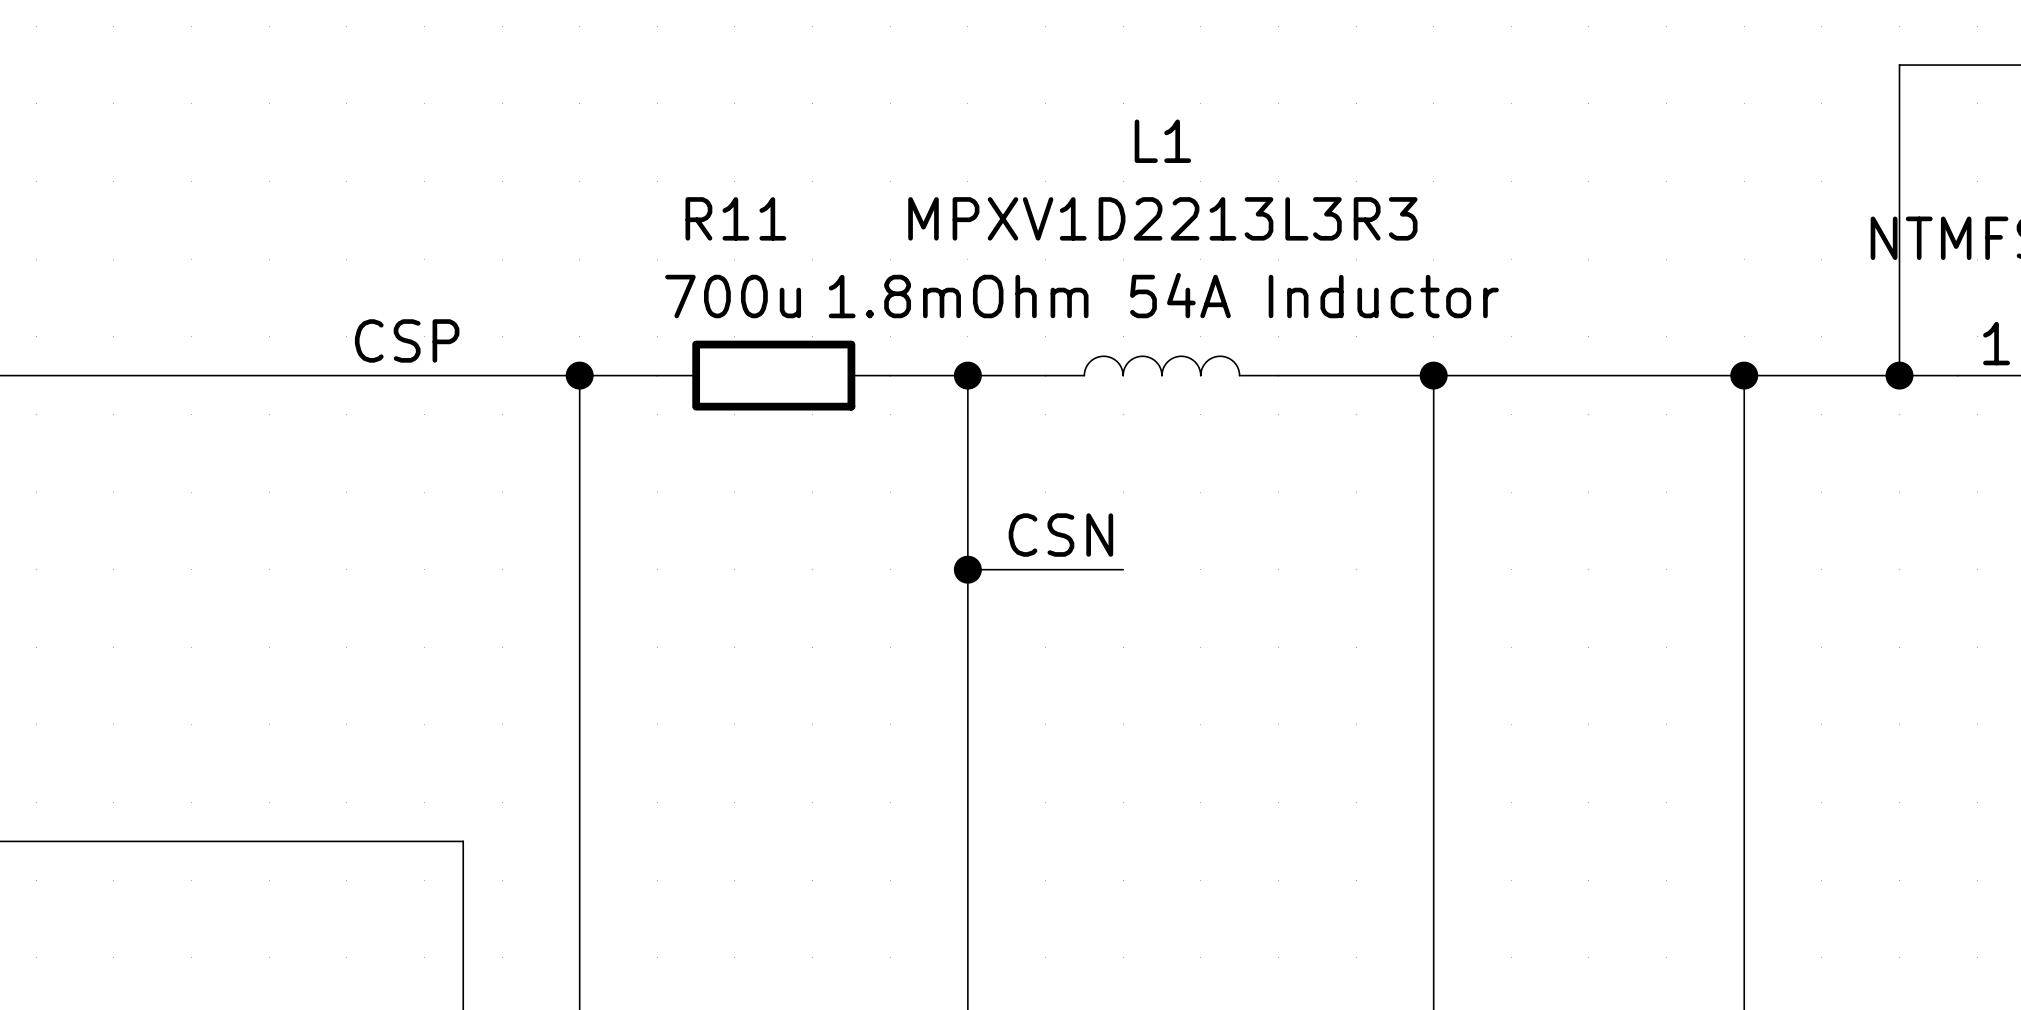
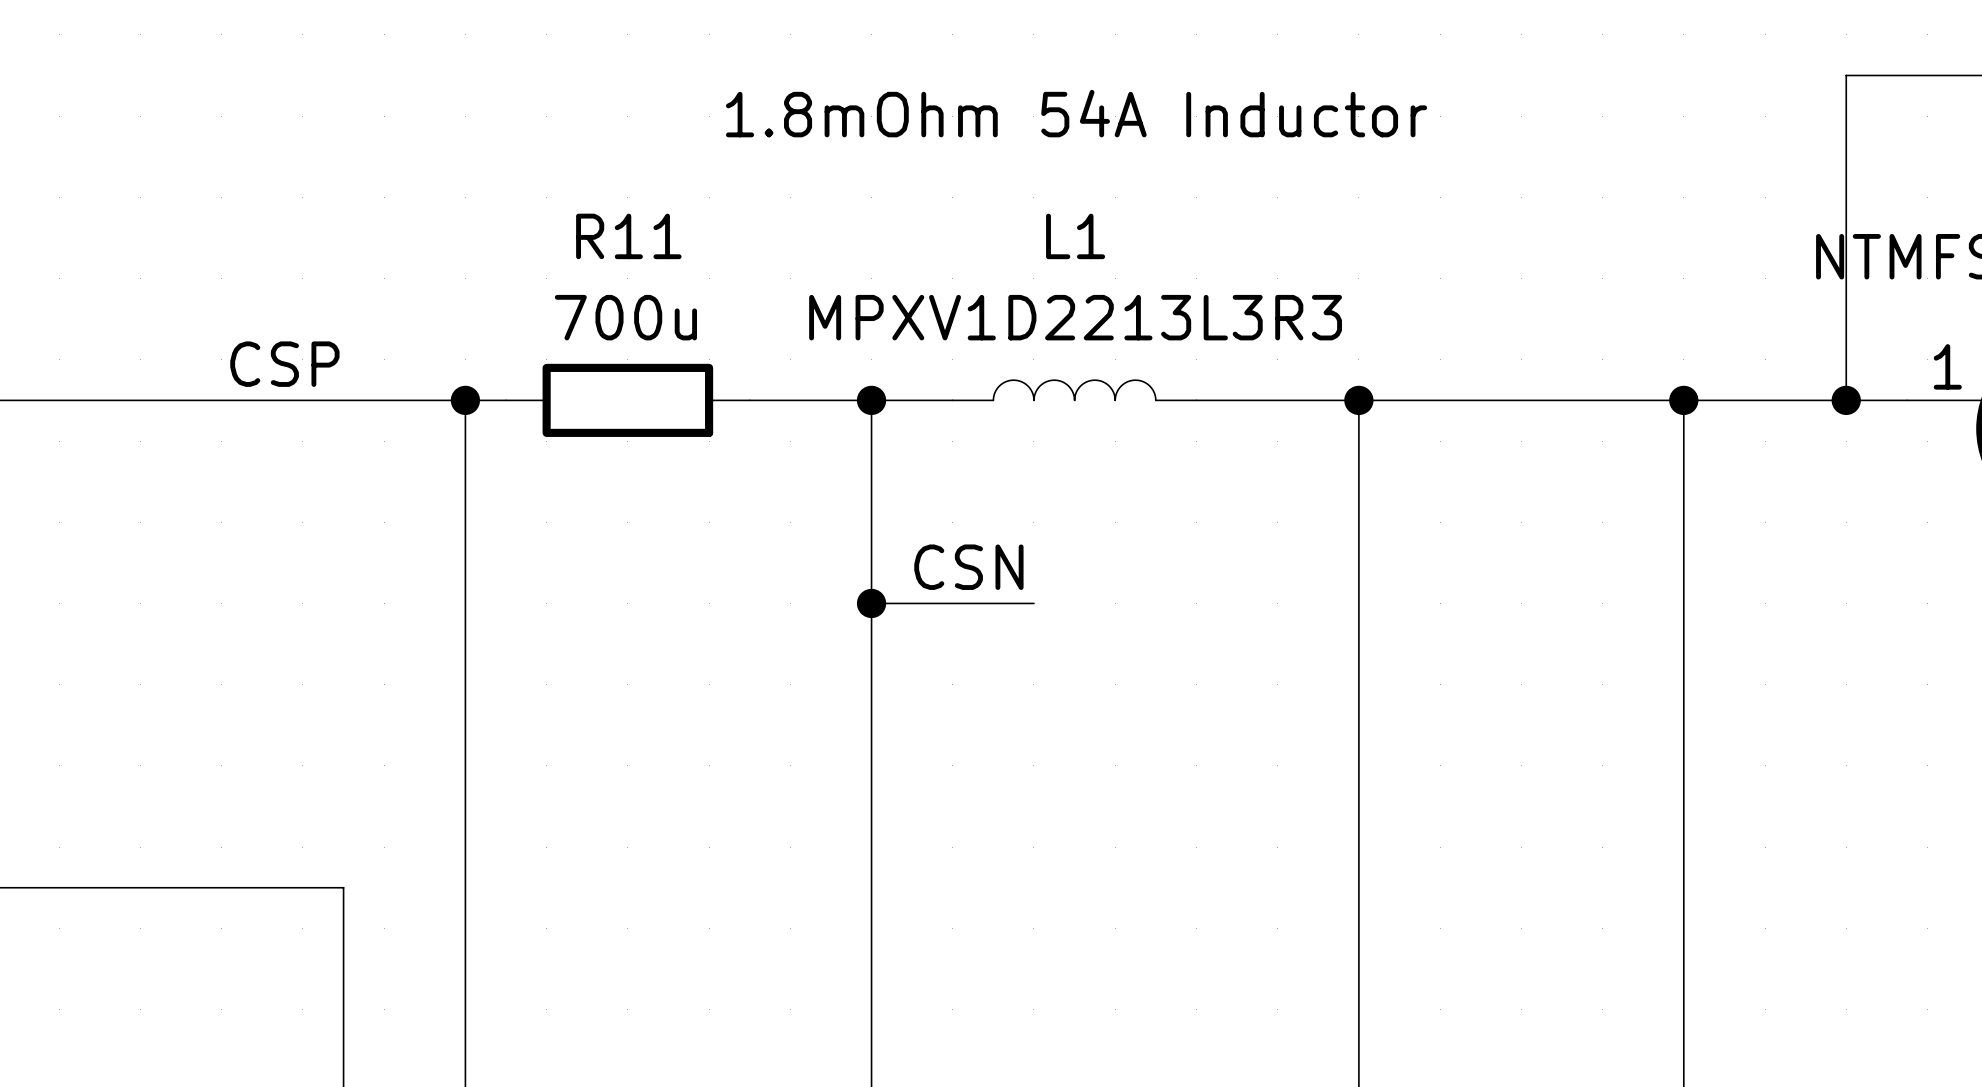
L1 name position: L1 (1162, 141) -> L1 (1075, 236)
L1 value position: MPXV1D2213L3R3 (1162, 218) -> MPXV1D2213L3R3 (1075, 317)
L1 text position: 1.8mOhm 54A Inductor (1163, 295) -> 1.8mOhm 54A Inductor (1076, 113)
R11 position: (773, 375) -> (627, 400)

